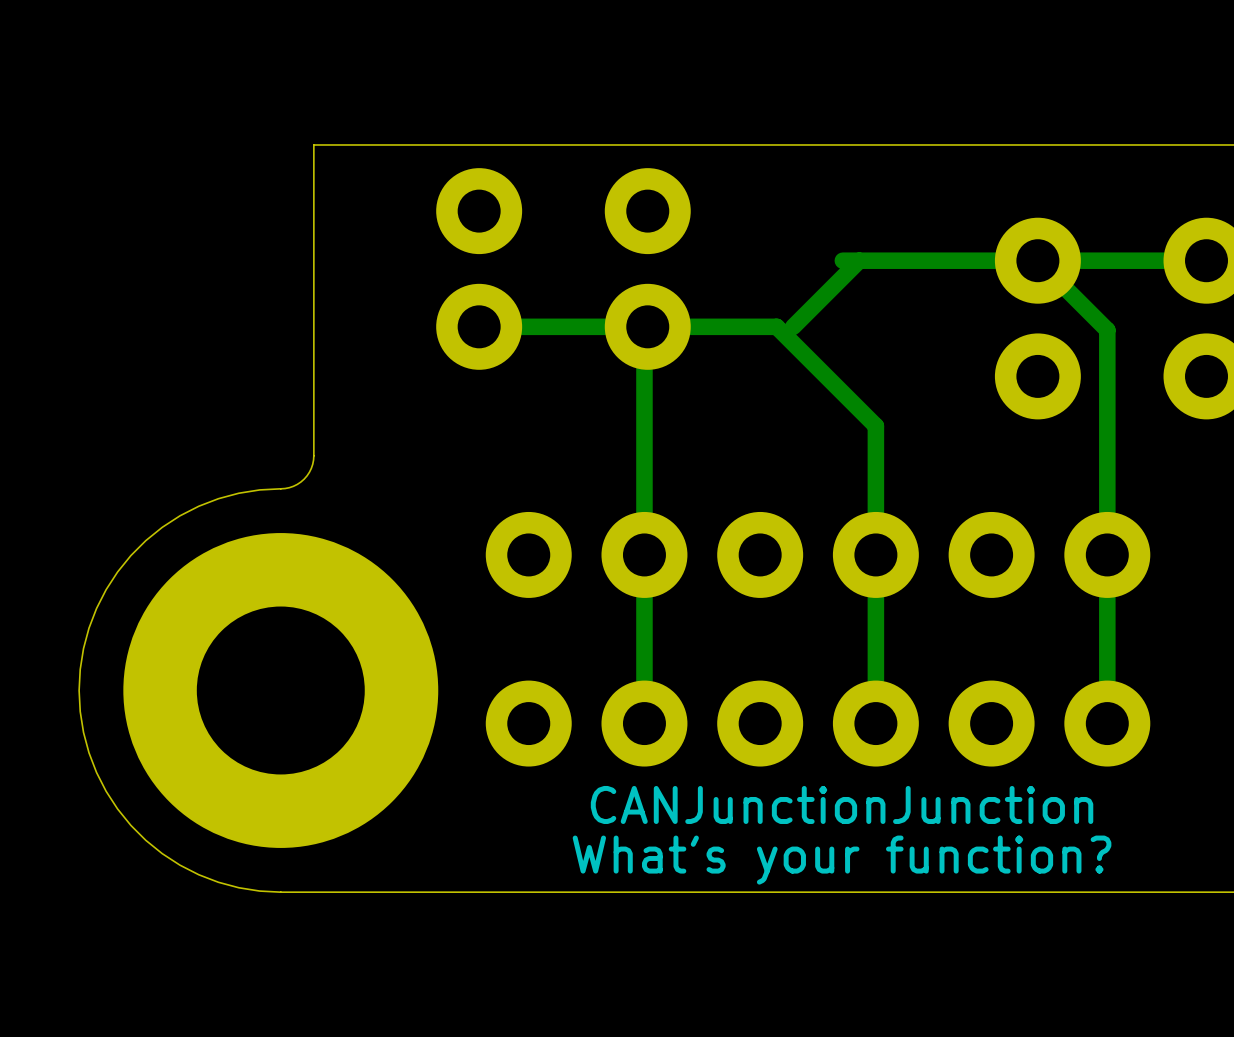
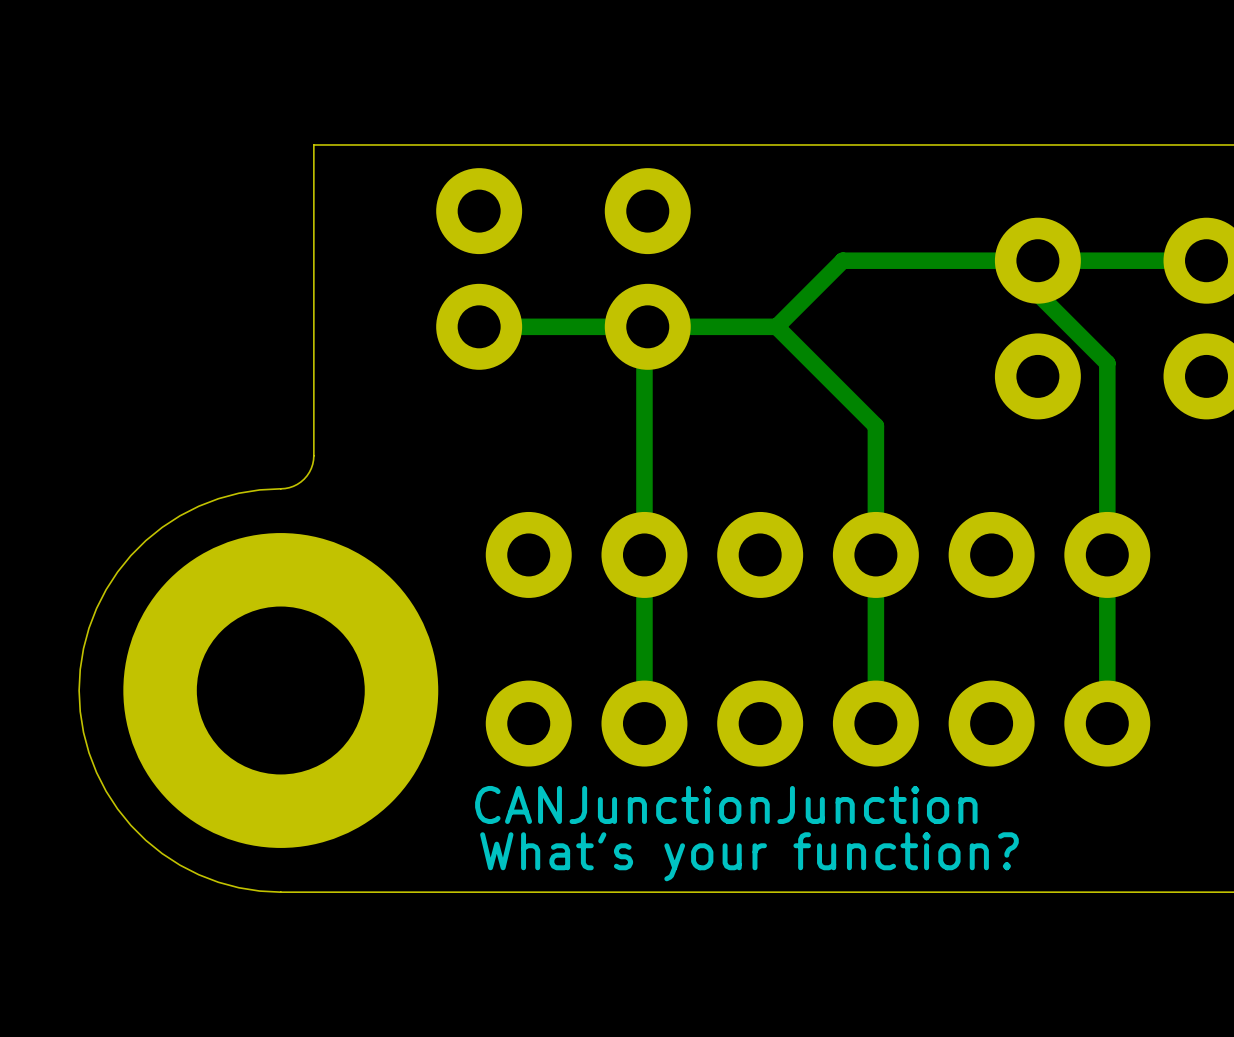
track: (859, 260) (793, 326) -> (842, 260) (776, 326)
track: (1037, 260) (1107, 330) (1107, 363) -> (1037, 260) (1004, 260) (1107, 363)
text position: CANJunctionJunction (842, 804) -> CANJunctionJunction (726, 804)
text position: What's your function? (842, 860) -> What's your function? (749, 856)

